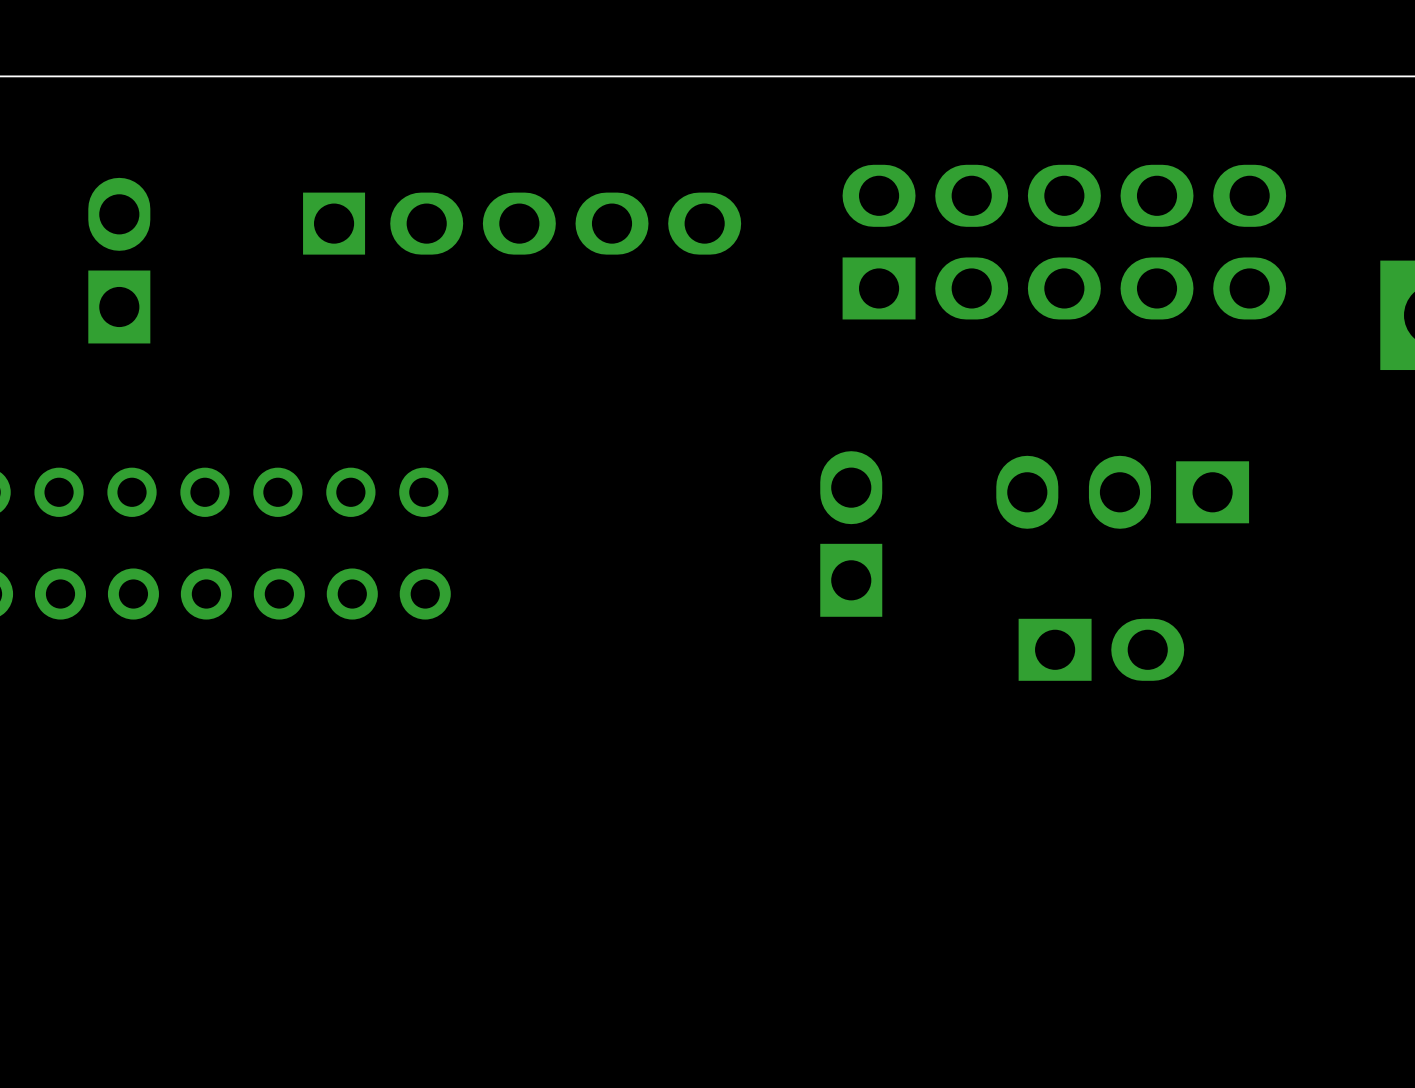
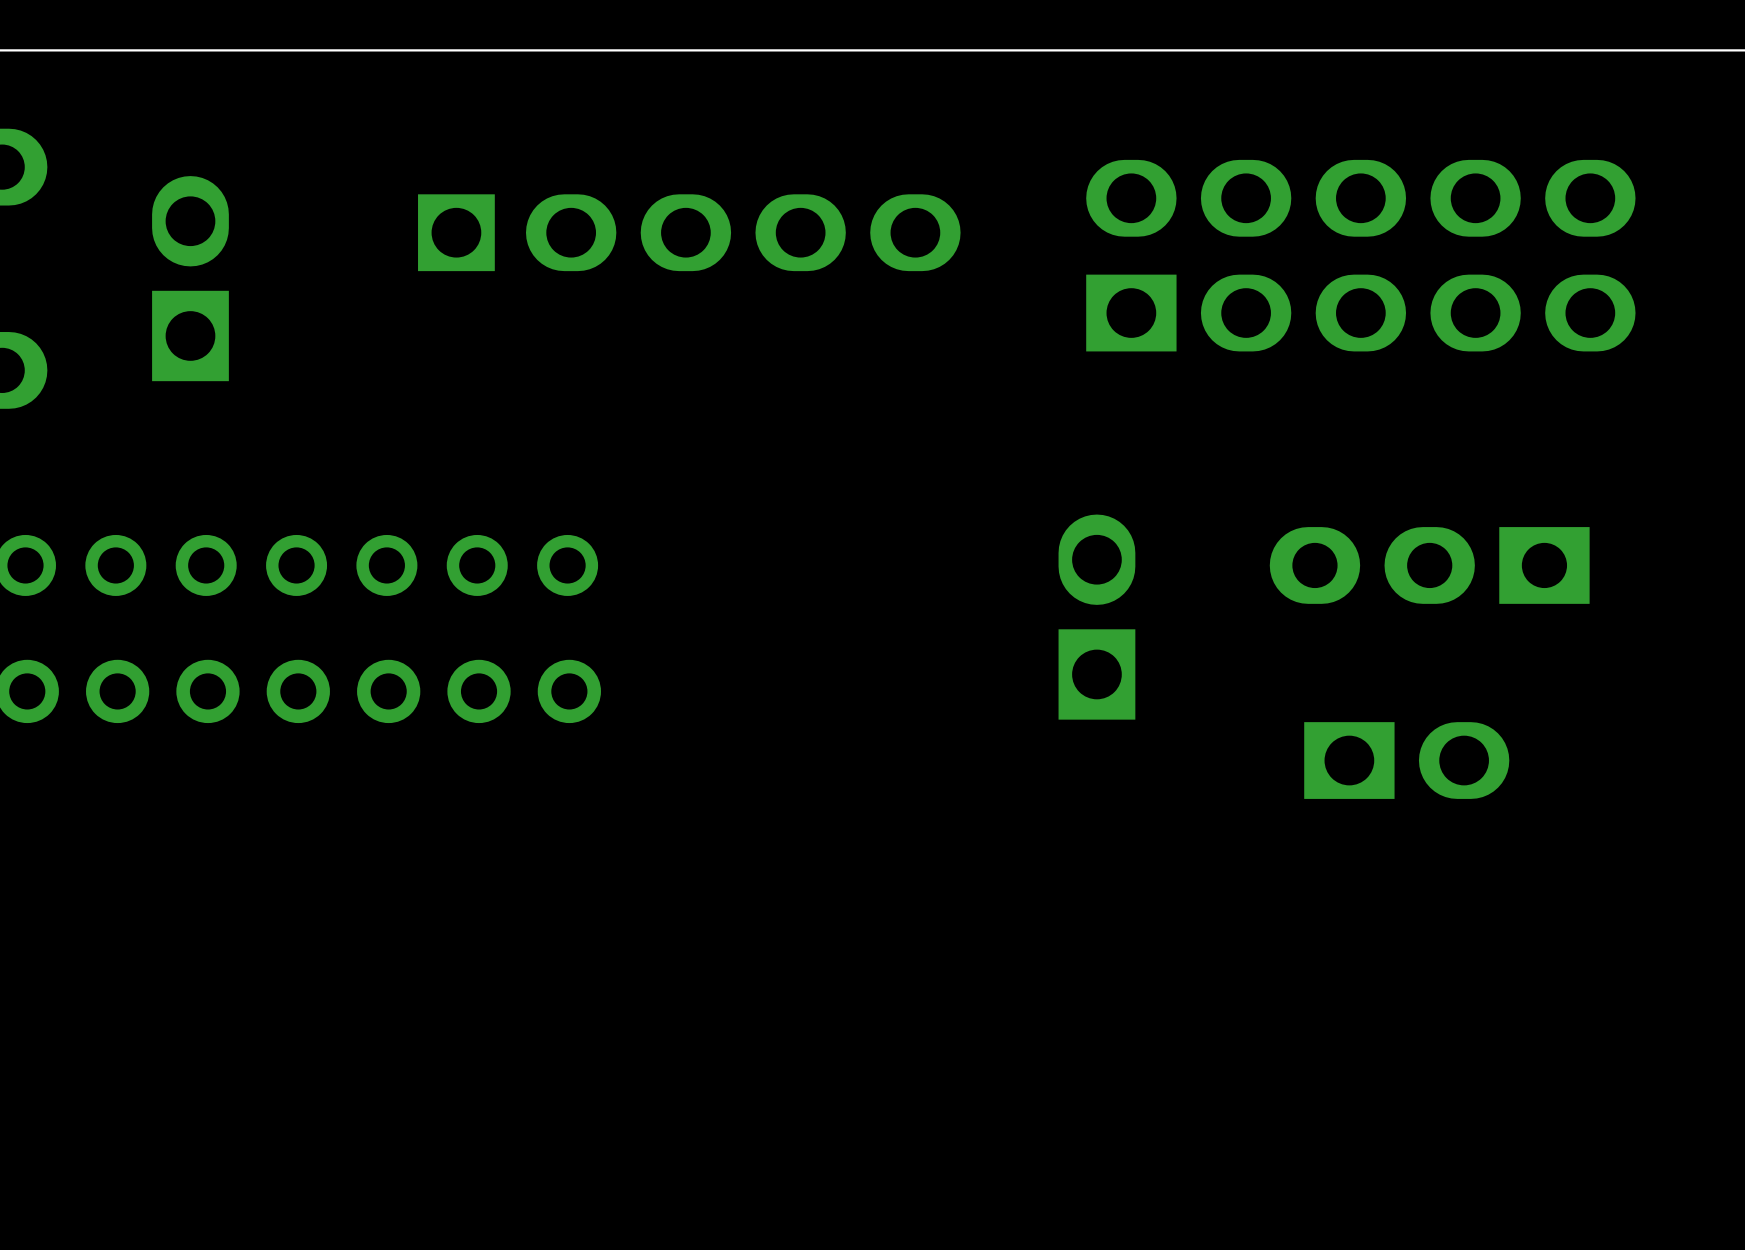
part footprint: [996, 455, 1250, 529] -> [1269, 527, 1590, 604]

